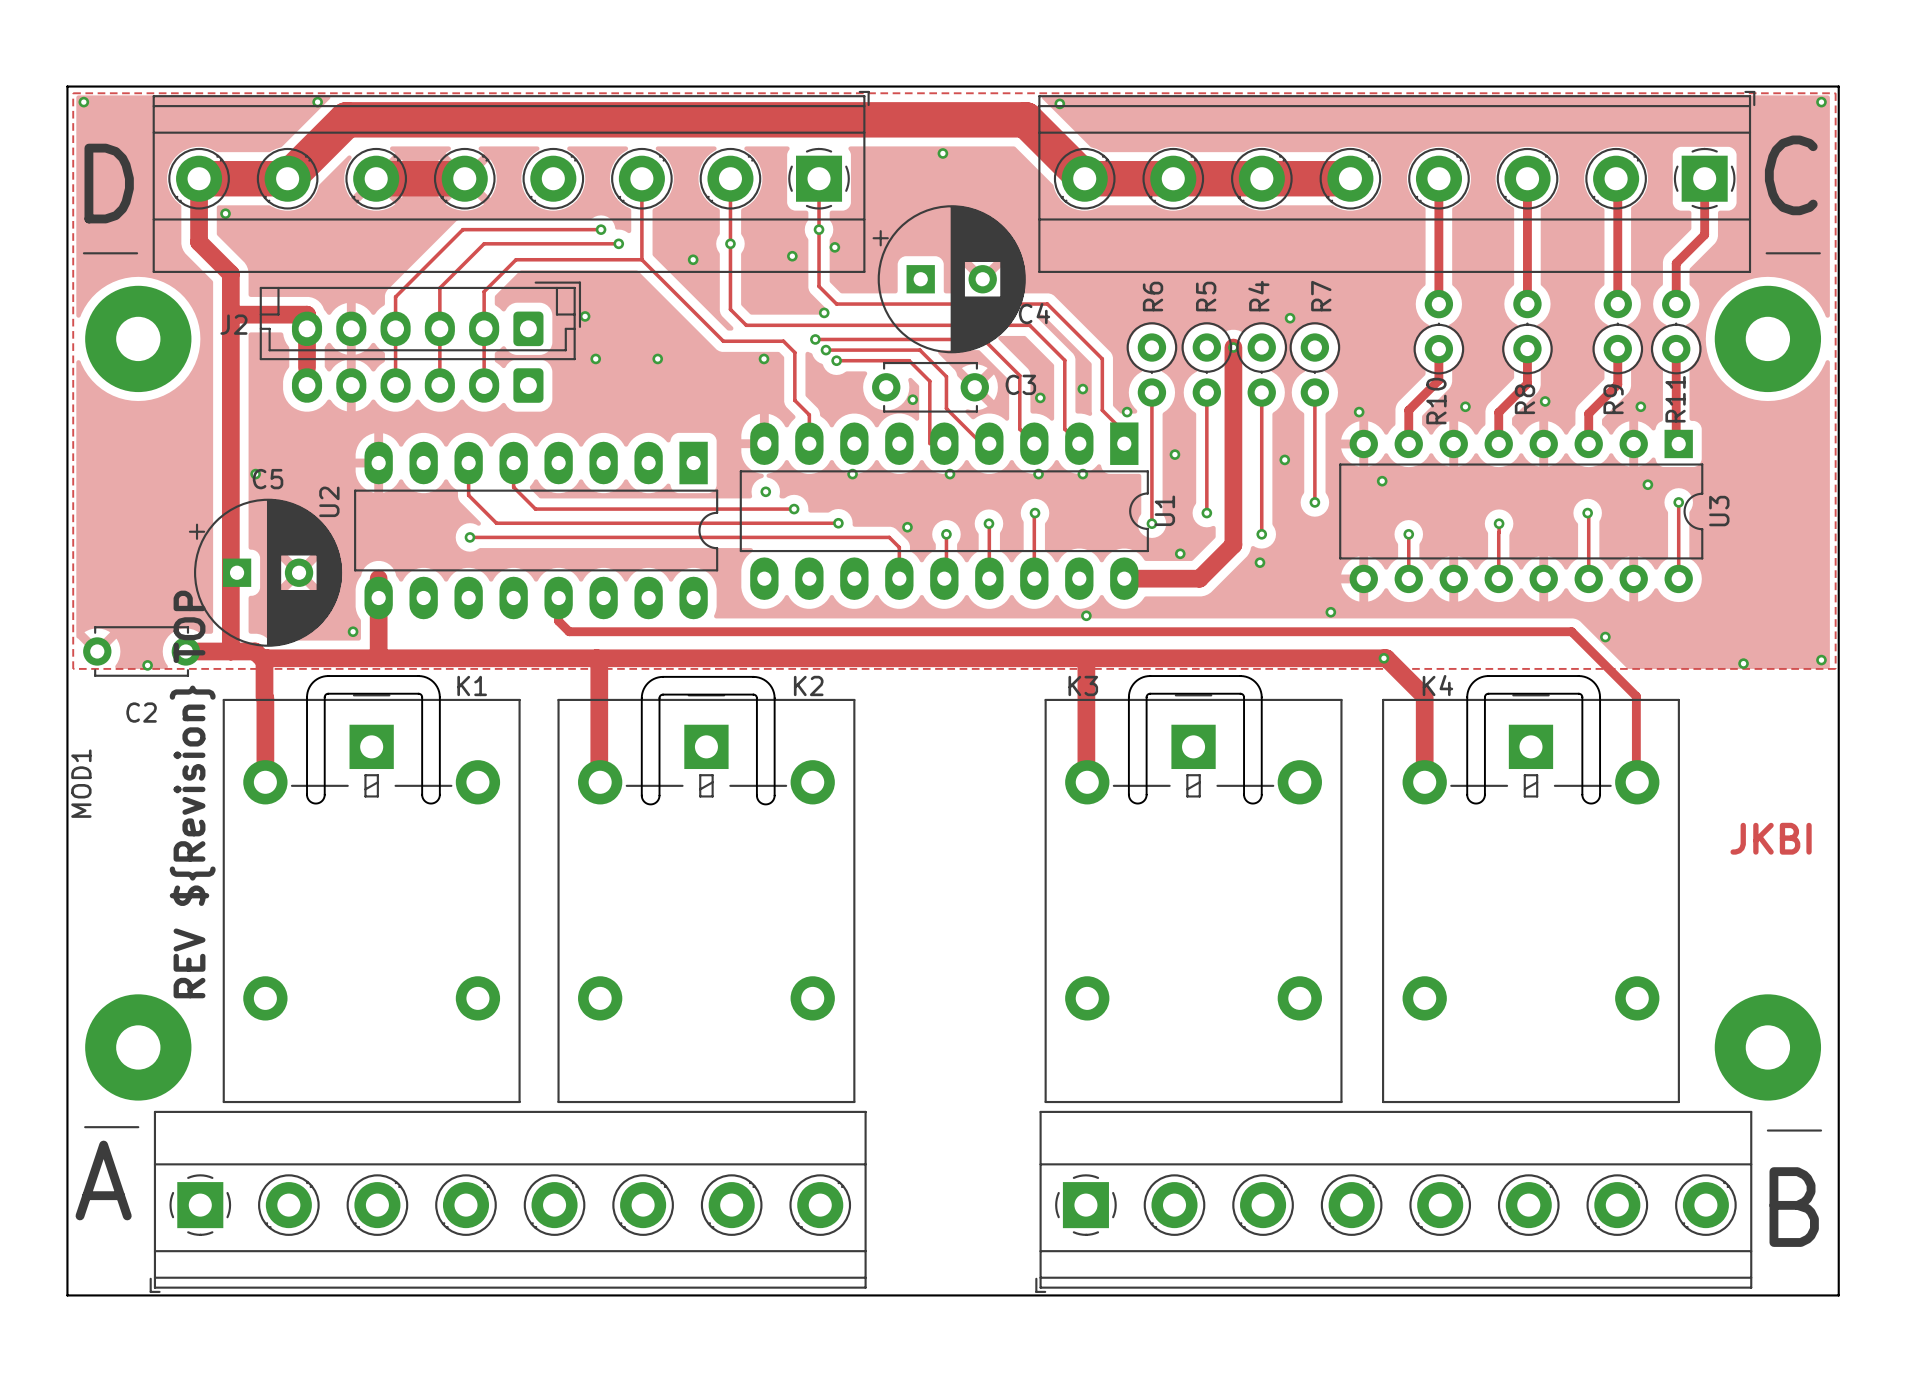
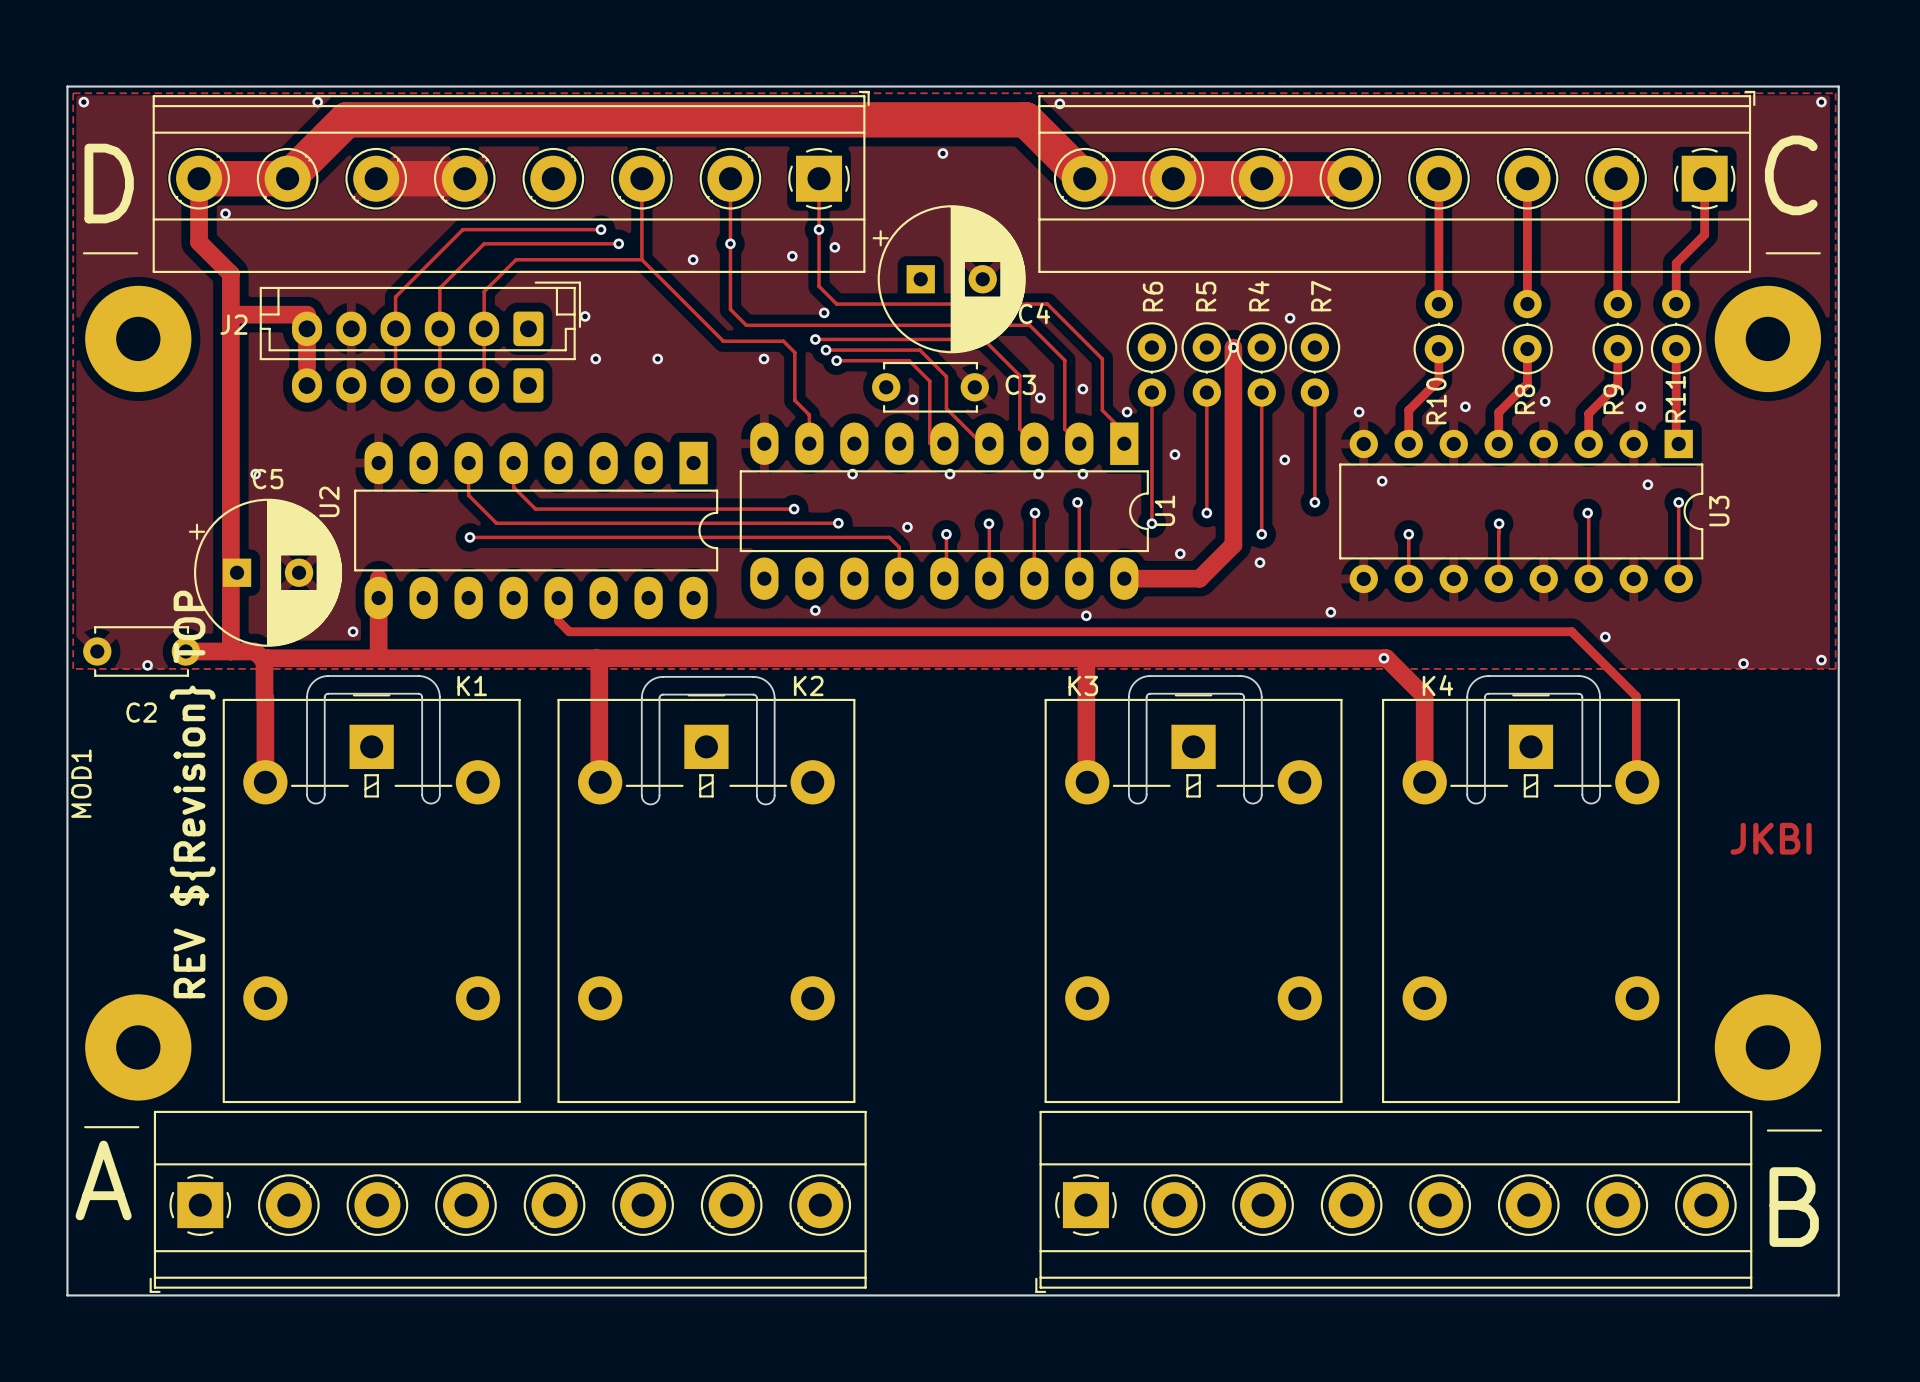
via: (765, 491) -> none
track: none -> (1077, 502) (1079, 504) (1079, 578)
via: none -> (1077, 502)
via: none -> (815, 610)

